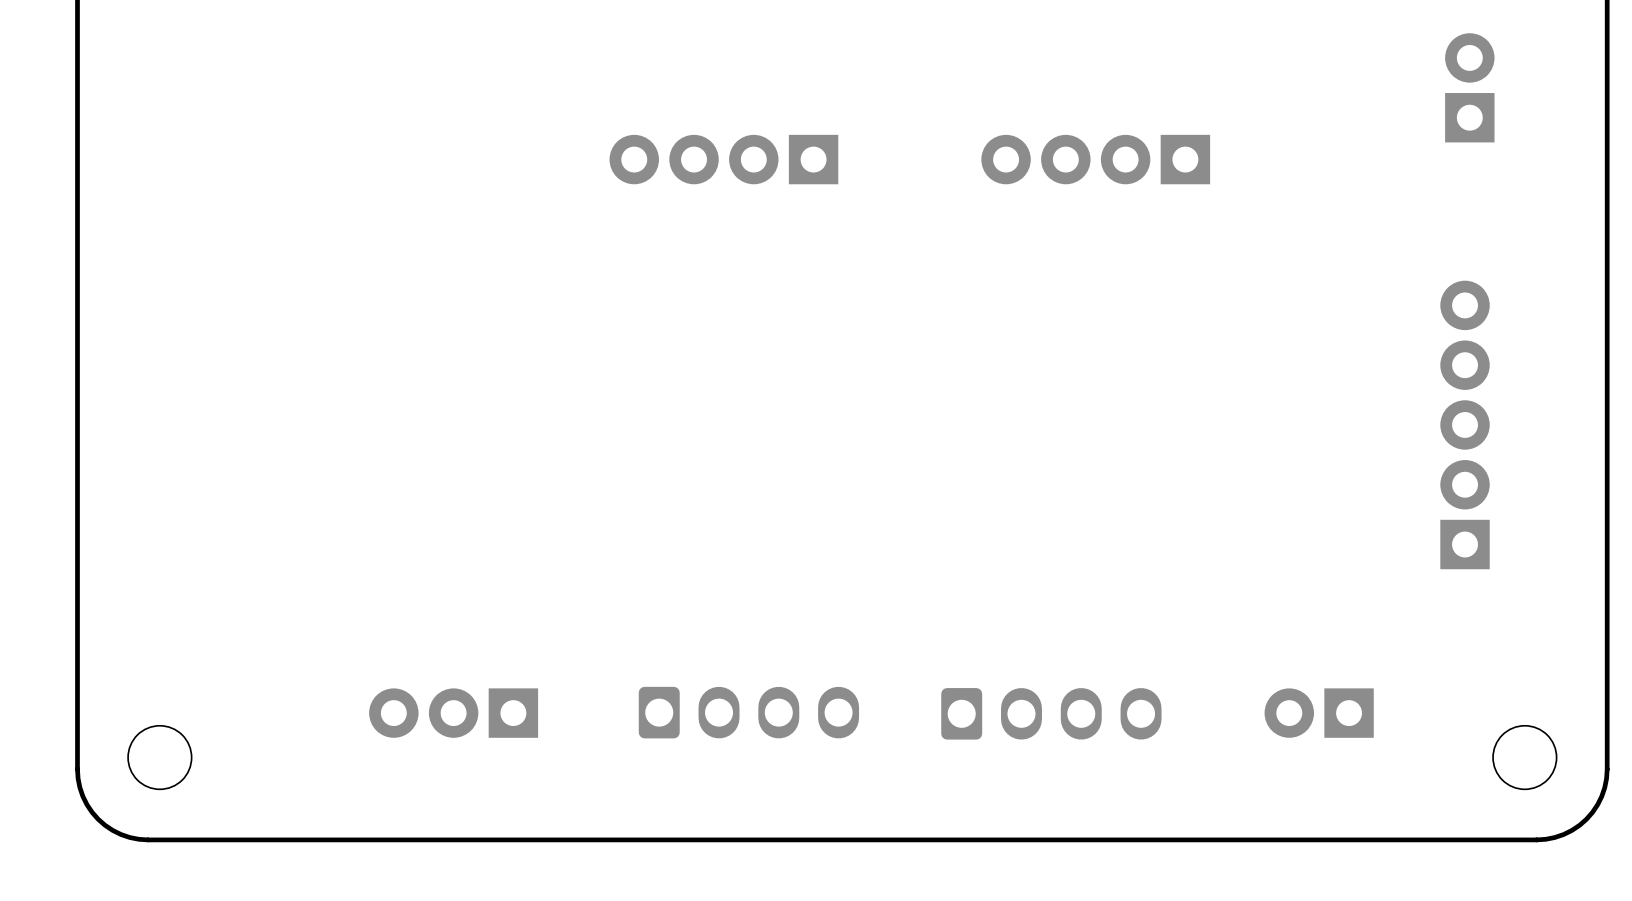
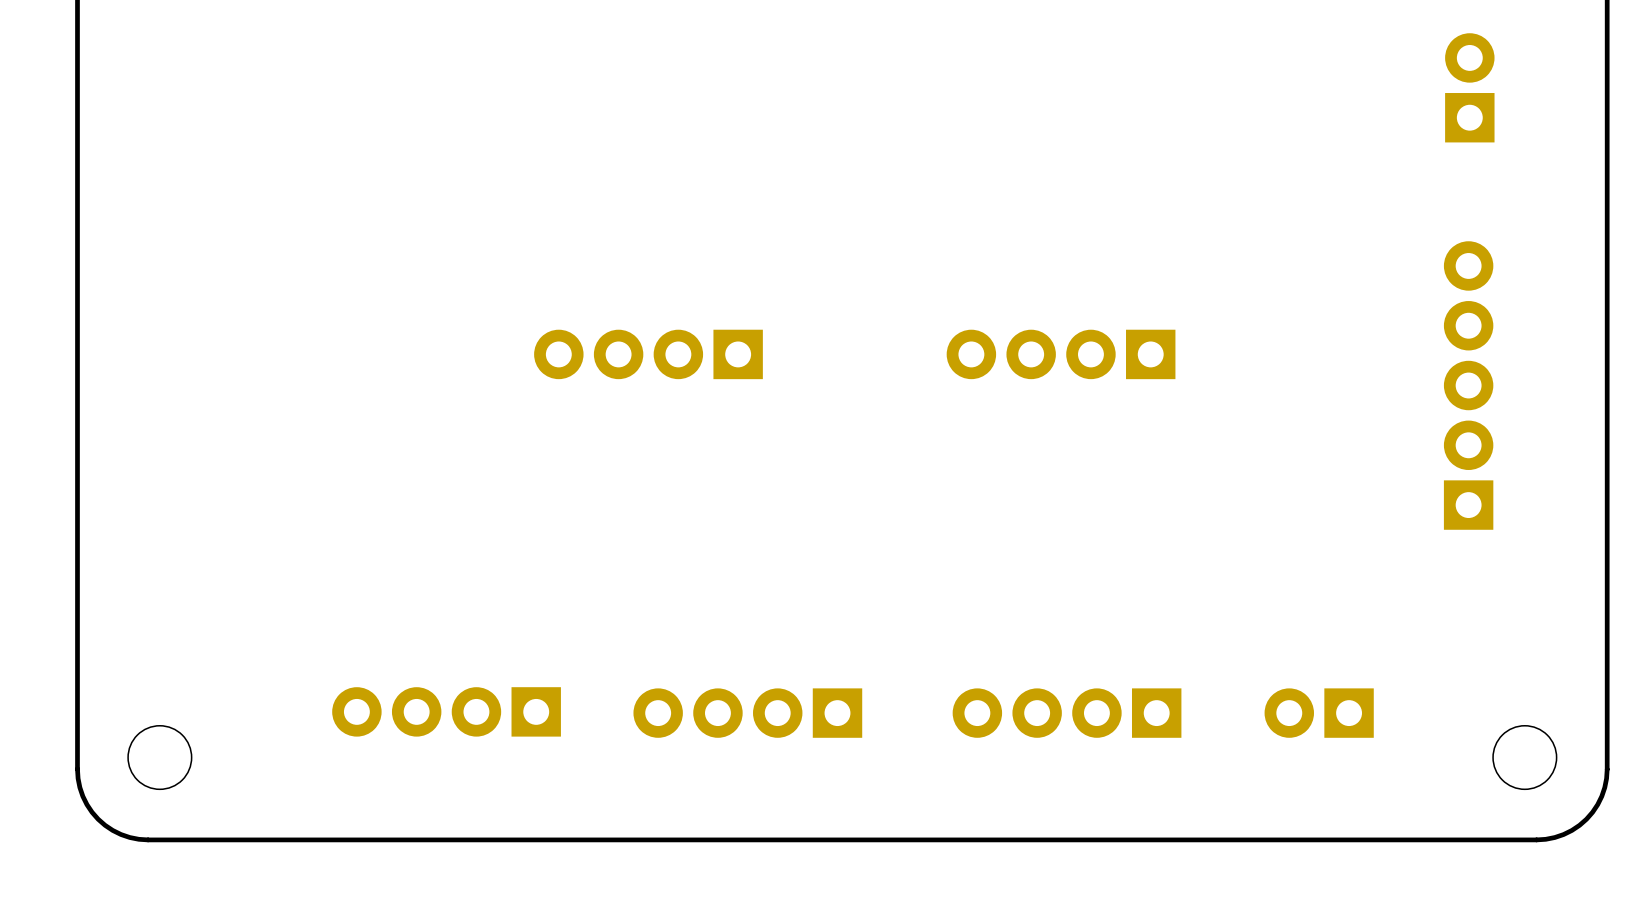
part: (723, 159) -> none
part: (1095, 159) -> none
part: none -> (648, 354)
part: none -> (1061, 354)
part position: (1465, 424) -> (1468, 385)
part footprint: [638, 686, 860, 739] -> [633, 688, 863, 738]
part footprint: [369, 688, 539, 738] -> [332, 687, 561, 737]
part footprint: [941, 688, 1162, 740] -> [952, 688, 1182, 738]

